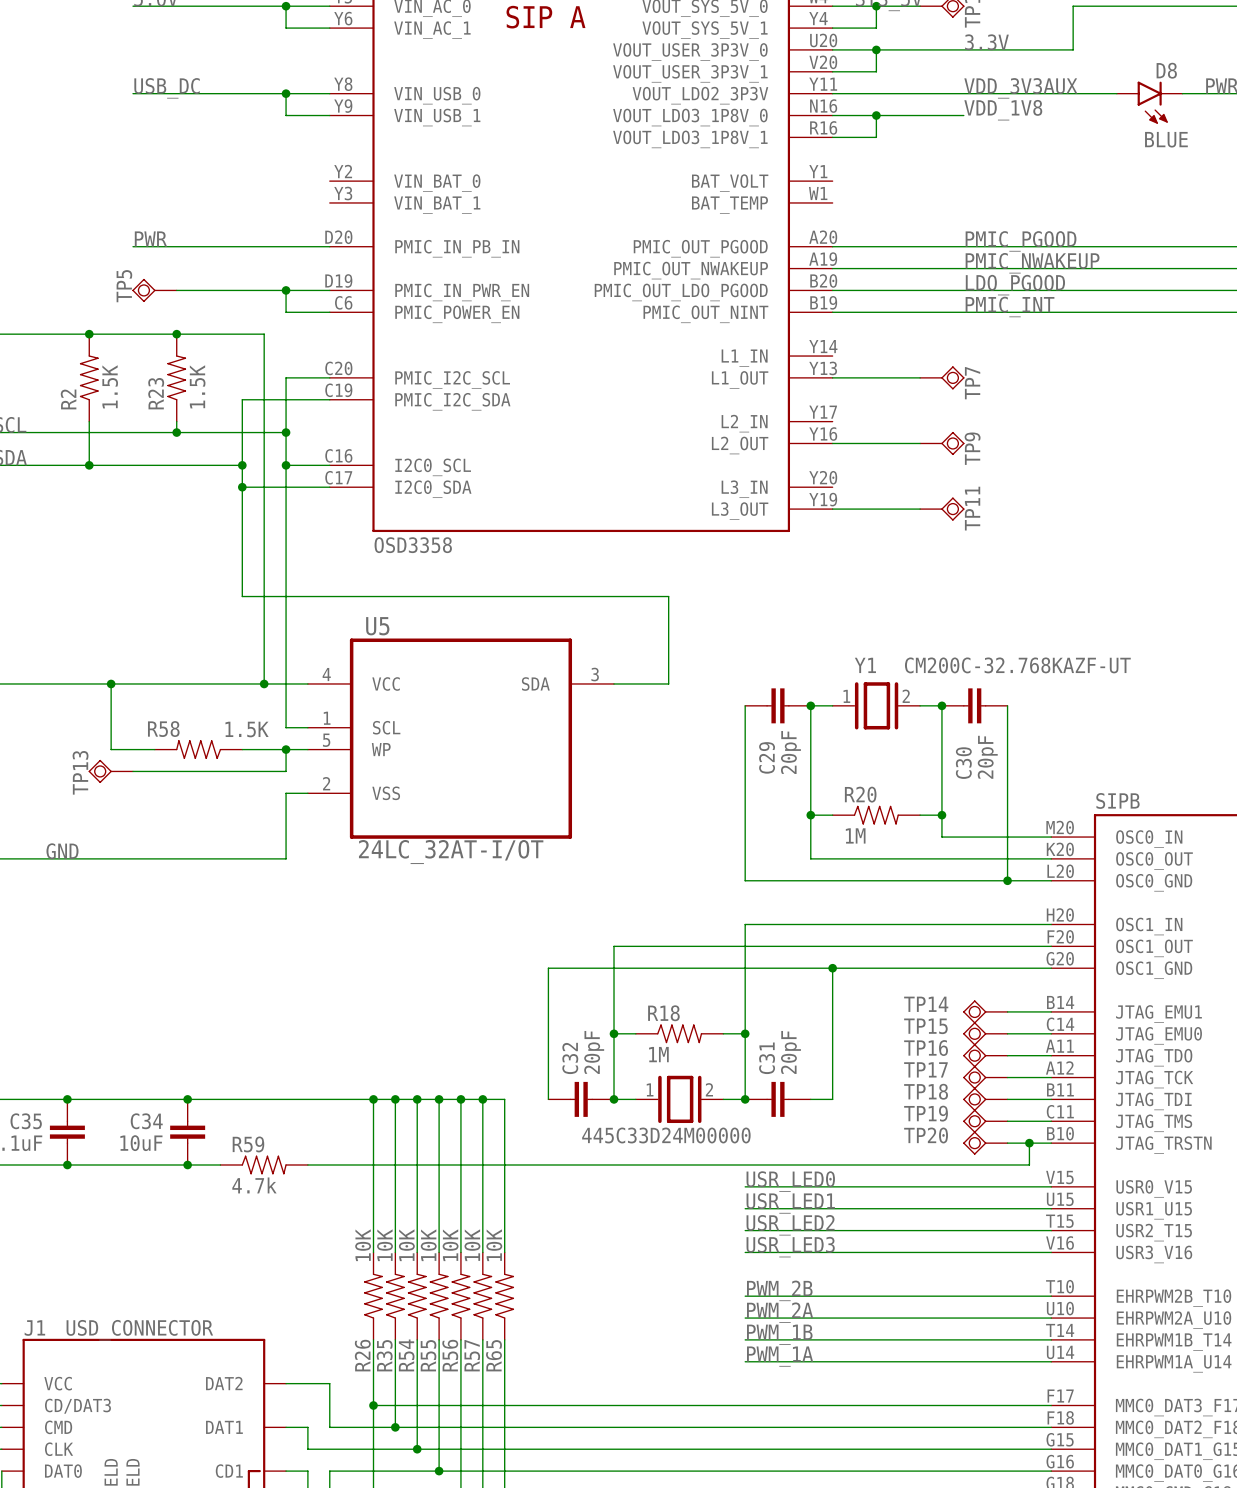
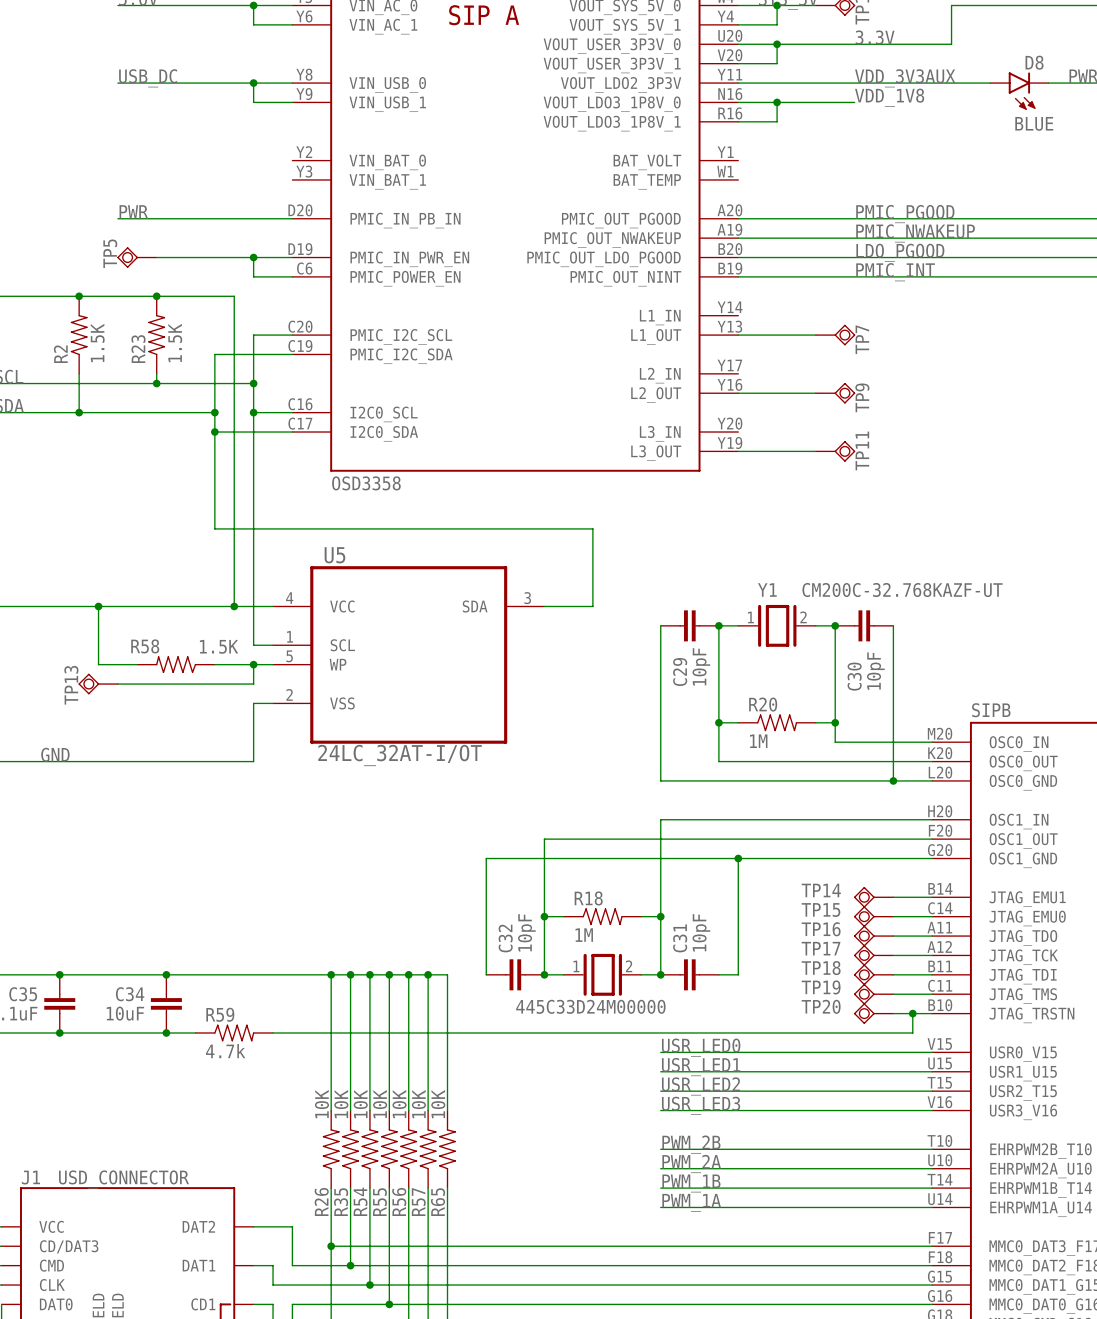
C29 value: 20pF (790, 752) -> 10pF (701, 666)
C30 value: 20pF (987, 757) -> 10pF (875, 671)
C32 value: 20pF (594, 1052) -> 10pF (526, 932)
C31 value: 20pF (790, 1052) -> 10pF (701, 932)

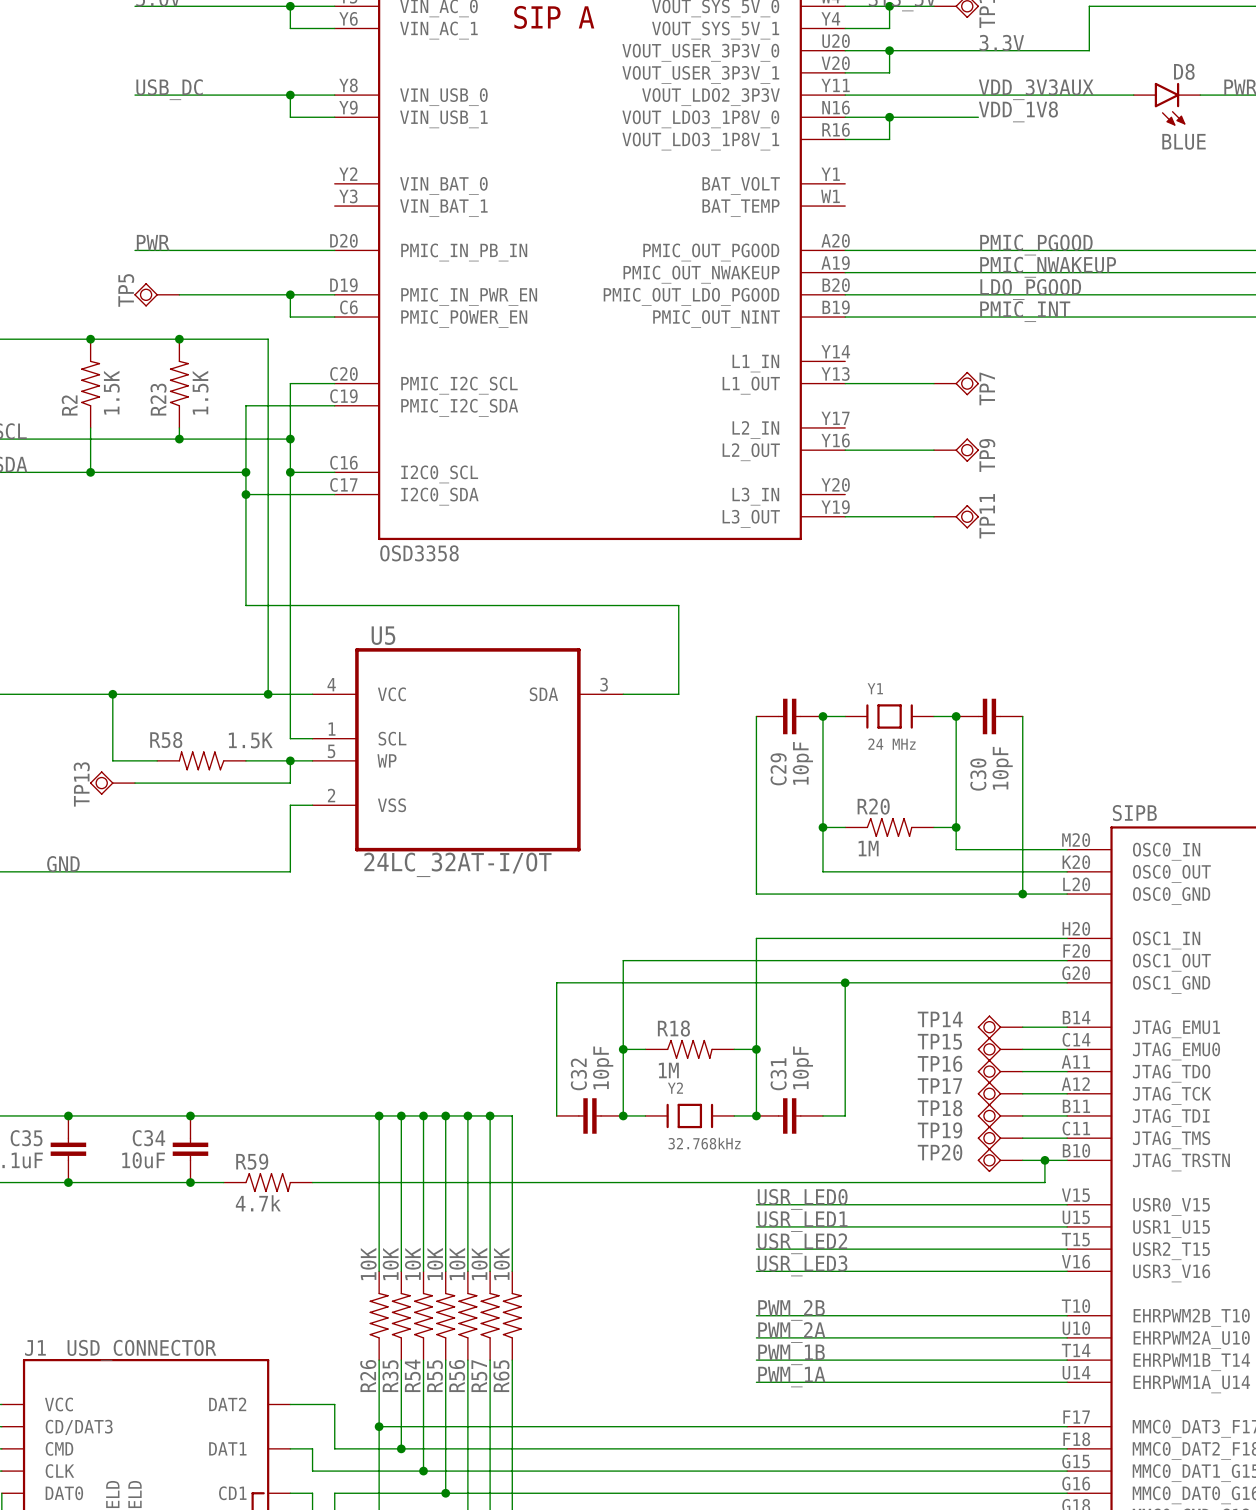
part: CM200C-32.768KAZF-UT (777, 625) -> none
Y1: none -> 24 MHz (889, 716)
part: 445C33D24M00000 (602, 974) -> none
Y2: none -> 32.768kHz (689, 1115)

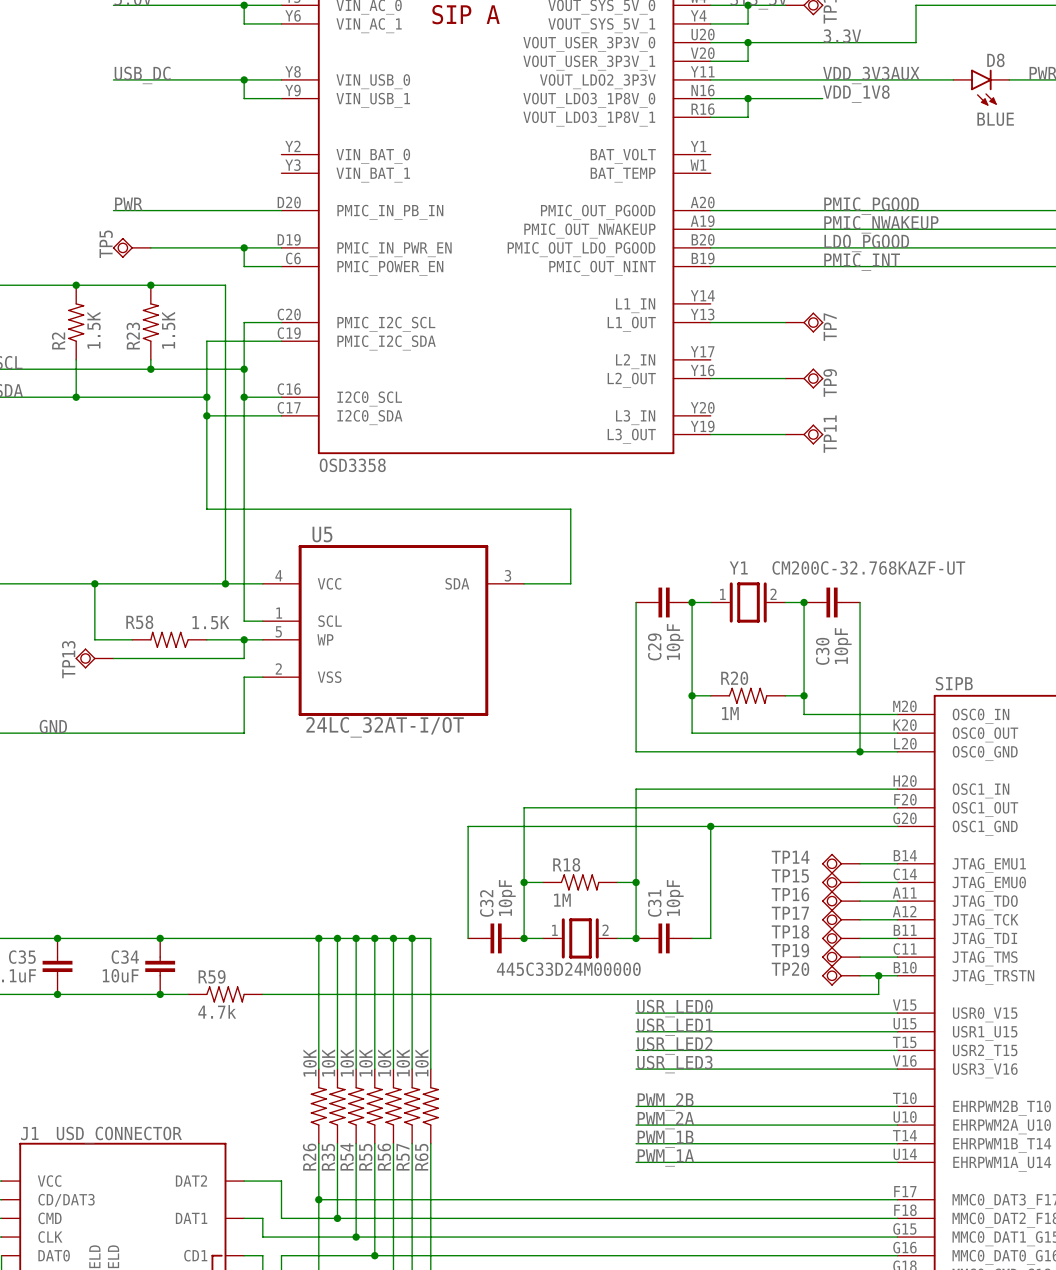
Y1: 24 MHz (889, 716) -> none
part: none -> CM200C-32.768KAZF-UT (748, 602)
Y2: 32.768kHz (689, 1115) -> none
part: none -> 445C33D24M00000 (580, 938)

